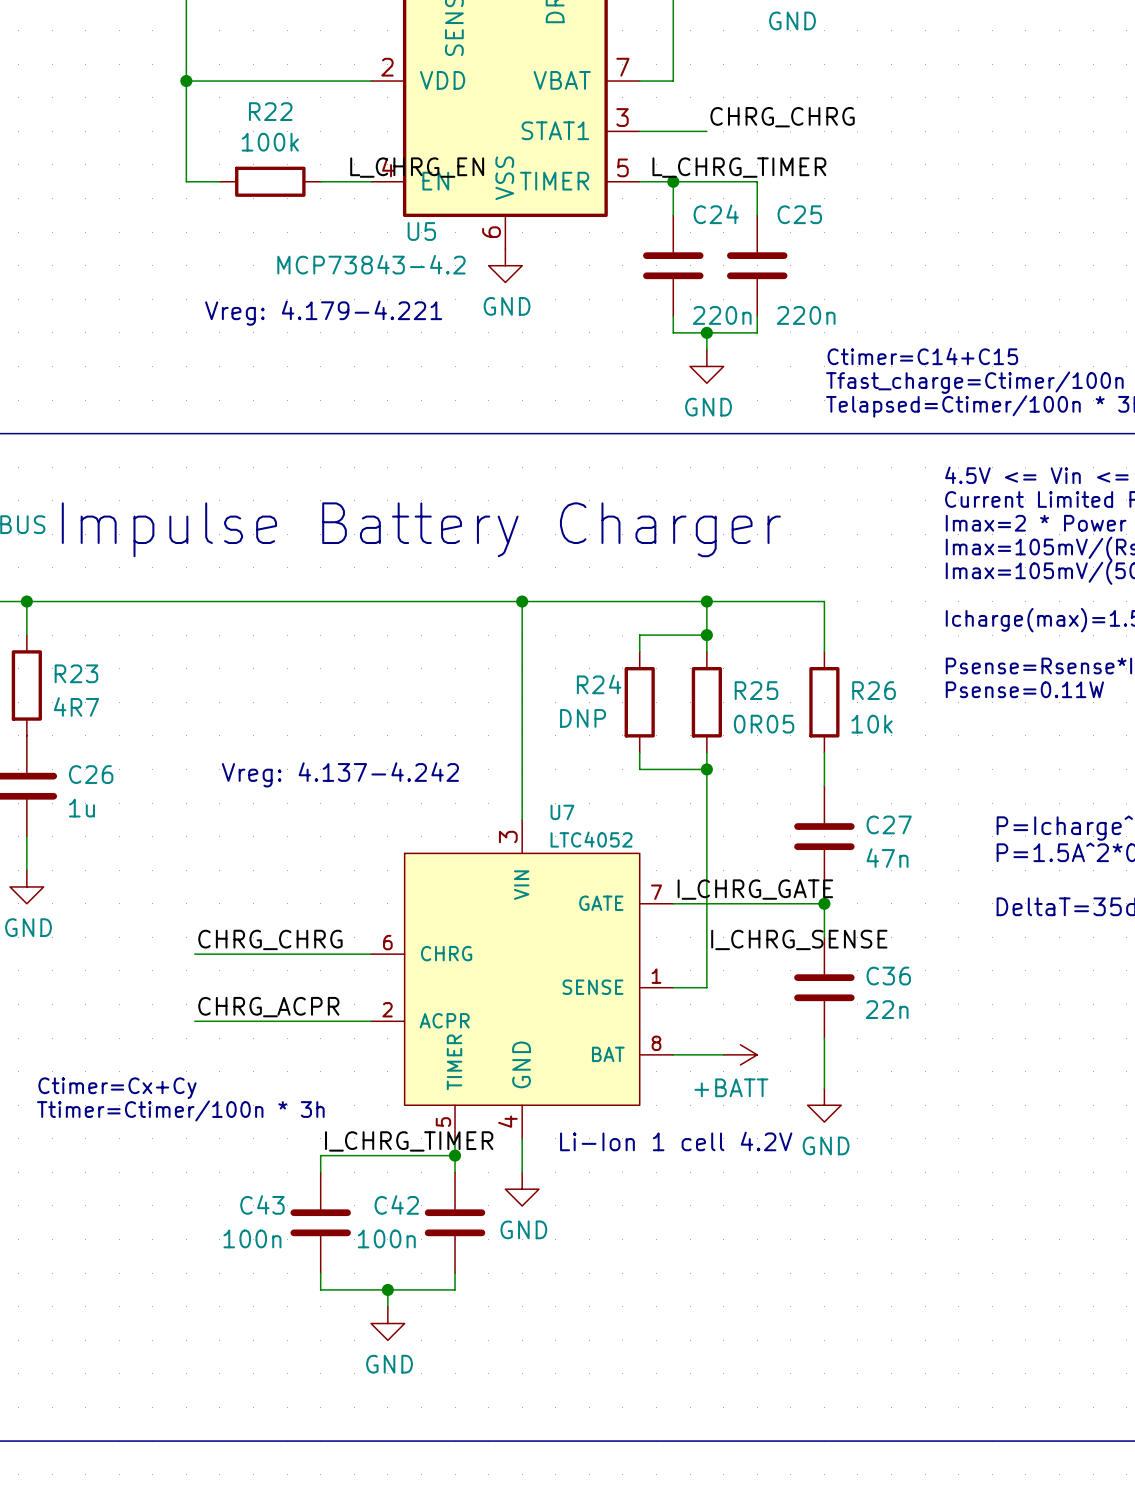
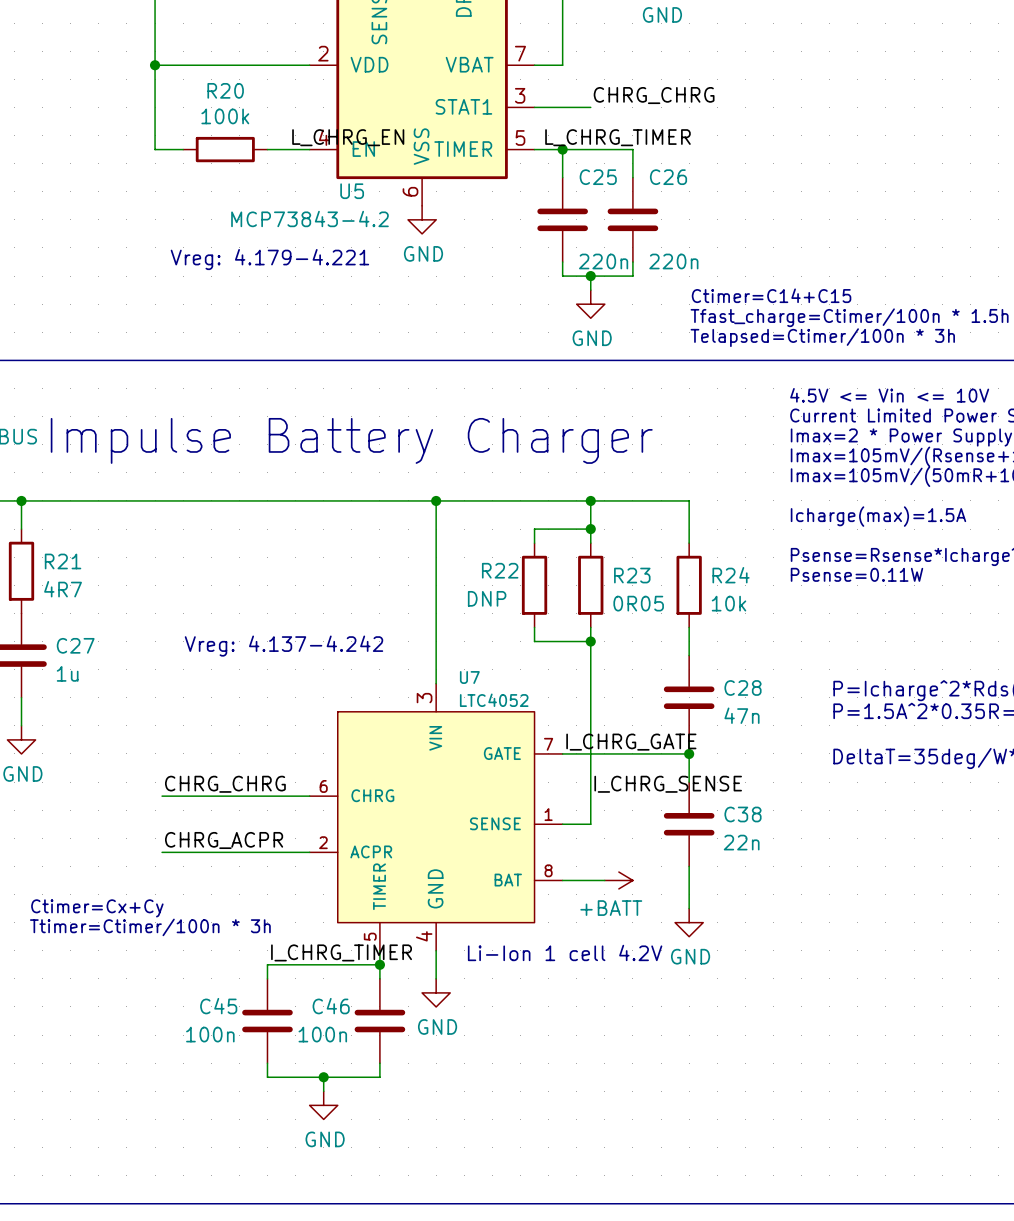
R22 name: R22 (270, 111) -> R20 (225, 90)
C24 name: C24 (716, 214) -> C25 (598, 177)
C25 name: C25 (799, 214) -> C26 (668, 177)
R23 name: R23 (76, 673) -> R21 (63, 561)
R24 name: R24 (599, 684) -> R22 (500, 570)
R25 name: R25 (756, 690) -> R23 (632, 575)
R26 name: R26 (874, 690) -> R24 (731, 575)
C26 name: C26 (91, 774) -> C27 (75, 645)
C27 name: C27 (889, 824) -> C28 (743, 687)
C36 name: C36 (888, 976) -> C38 (743, 814)
C43 name: C43 (262, 1204) -> C45 (218, 1006)
C42 name: C42 (396, 1204) -> C46 (331, 1006)

